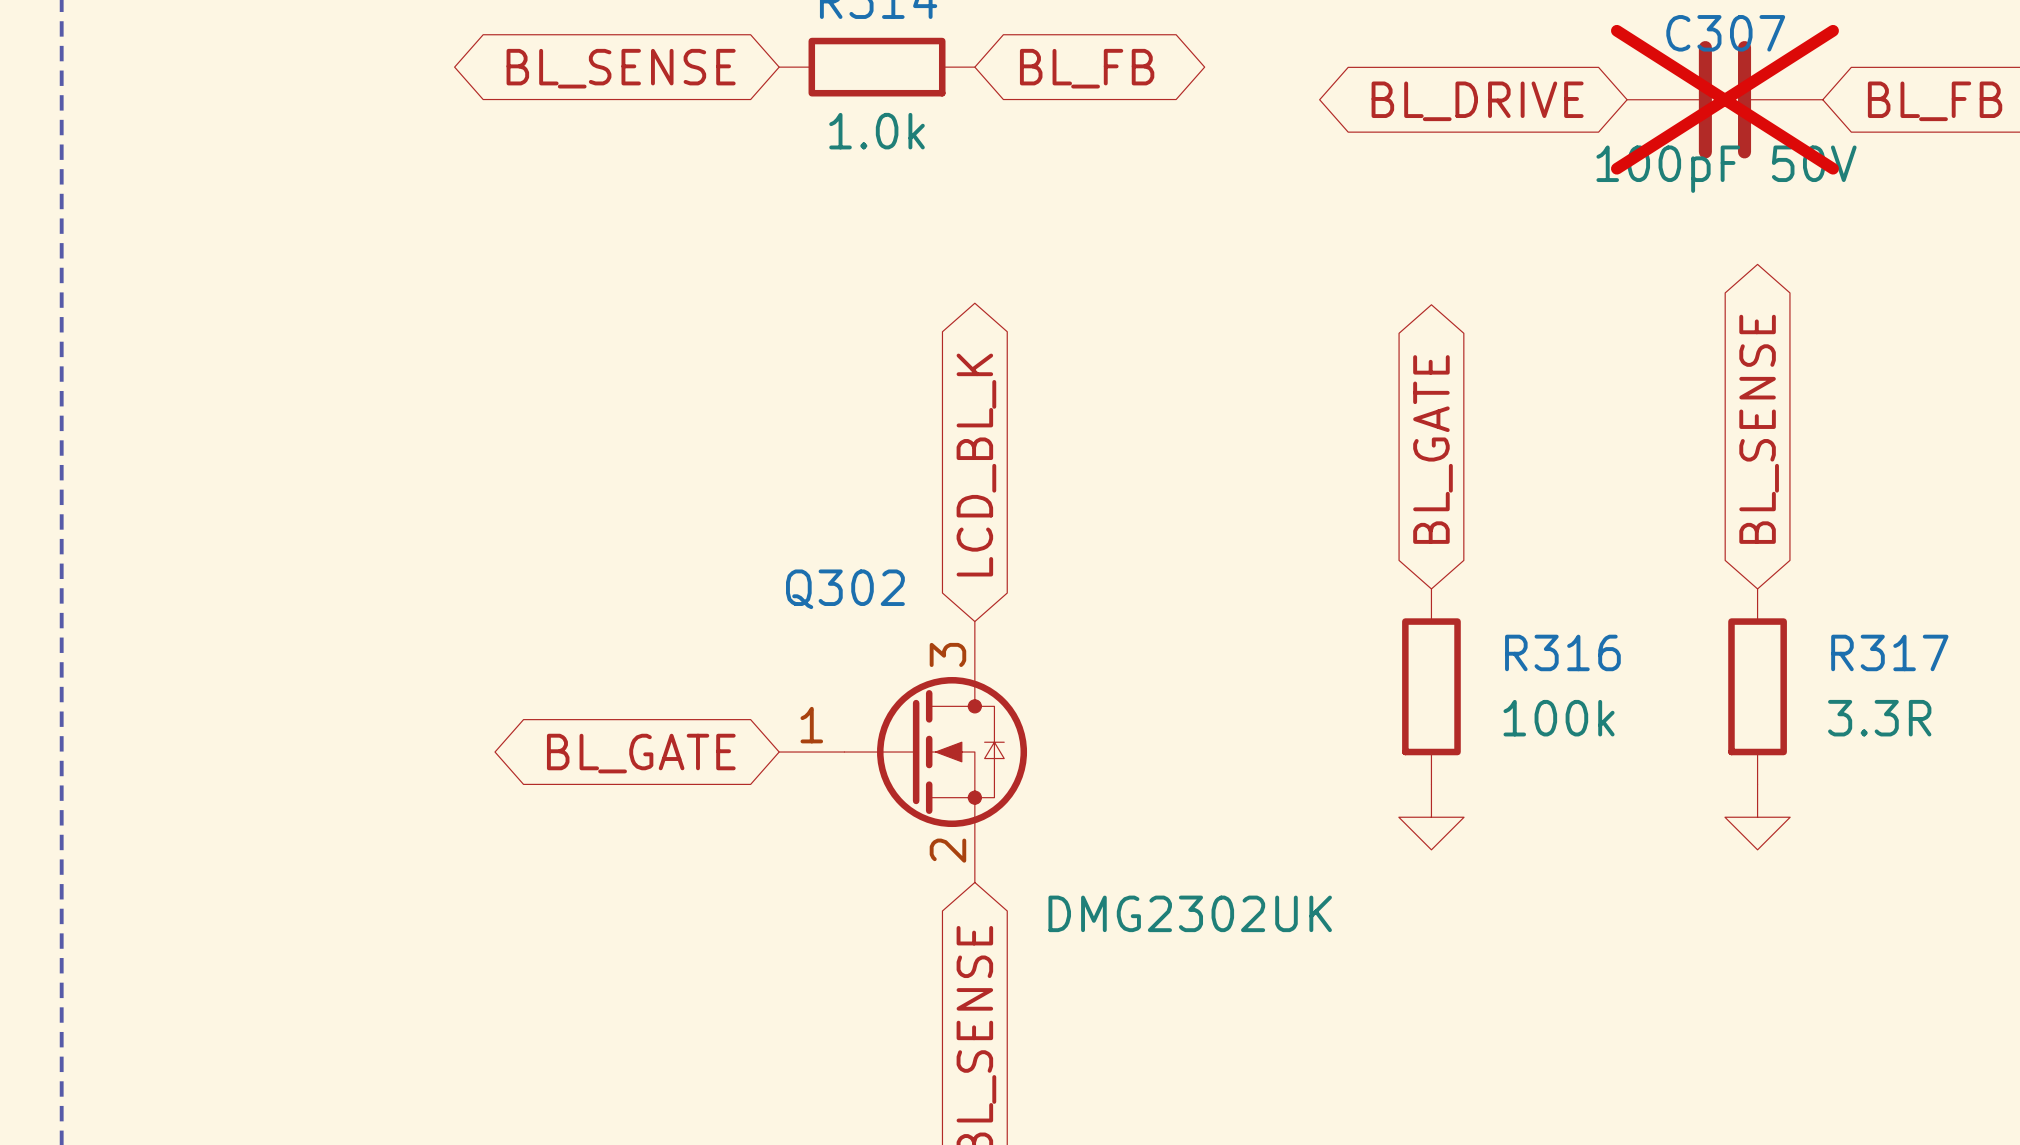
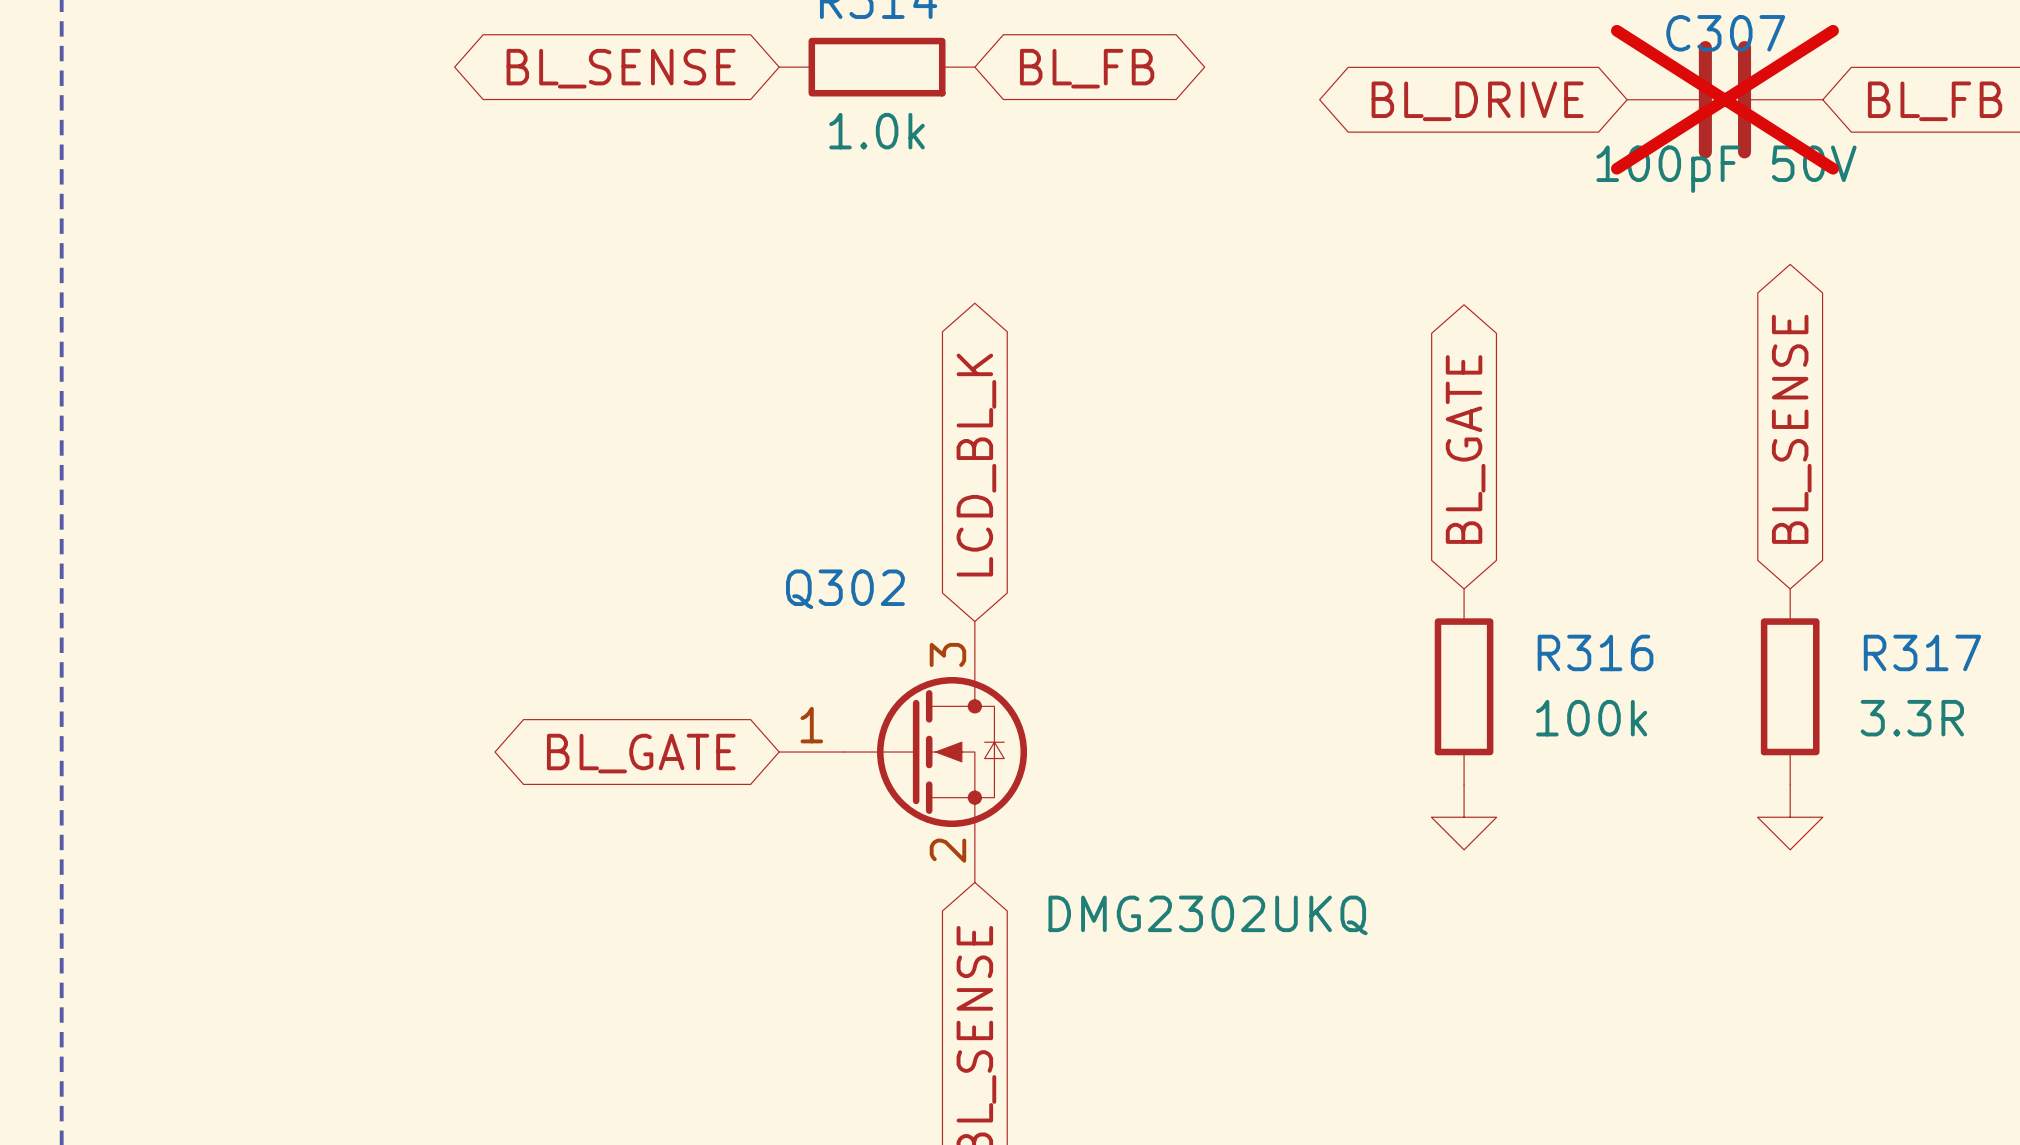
global label position: BL_SENSE (1759, 429) -> BL_SENSE (1791, 429)
global label position: BL_GATE (1432, 449) -> BL_GATE (1465, 449)
R316 position: (1431, 686) -> (1464, 686)
R317 position: (1757, 686) -> (1790, 686)
power symbol position: (1431, 817) -> (1464, 817)
power symbol position: (1757, 817) -> (1790, 817)
Q302 value: DMG2302UK (1190, 913) -> DMG2302UKQ (1208, 915)

